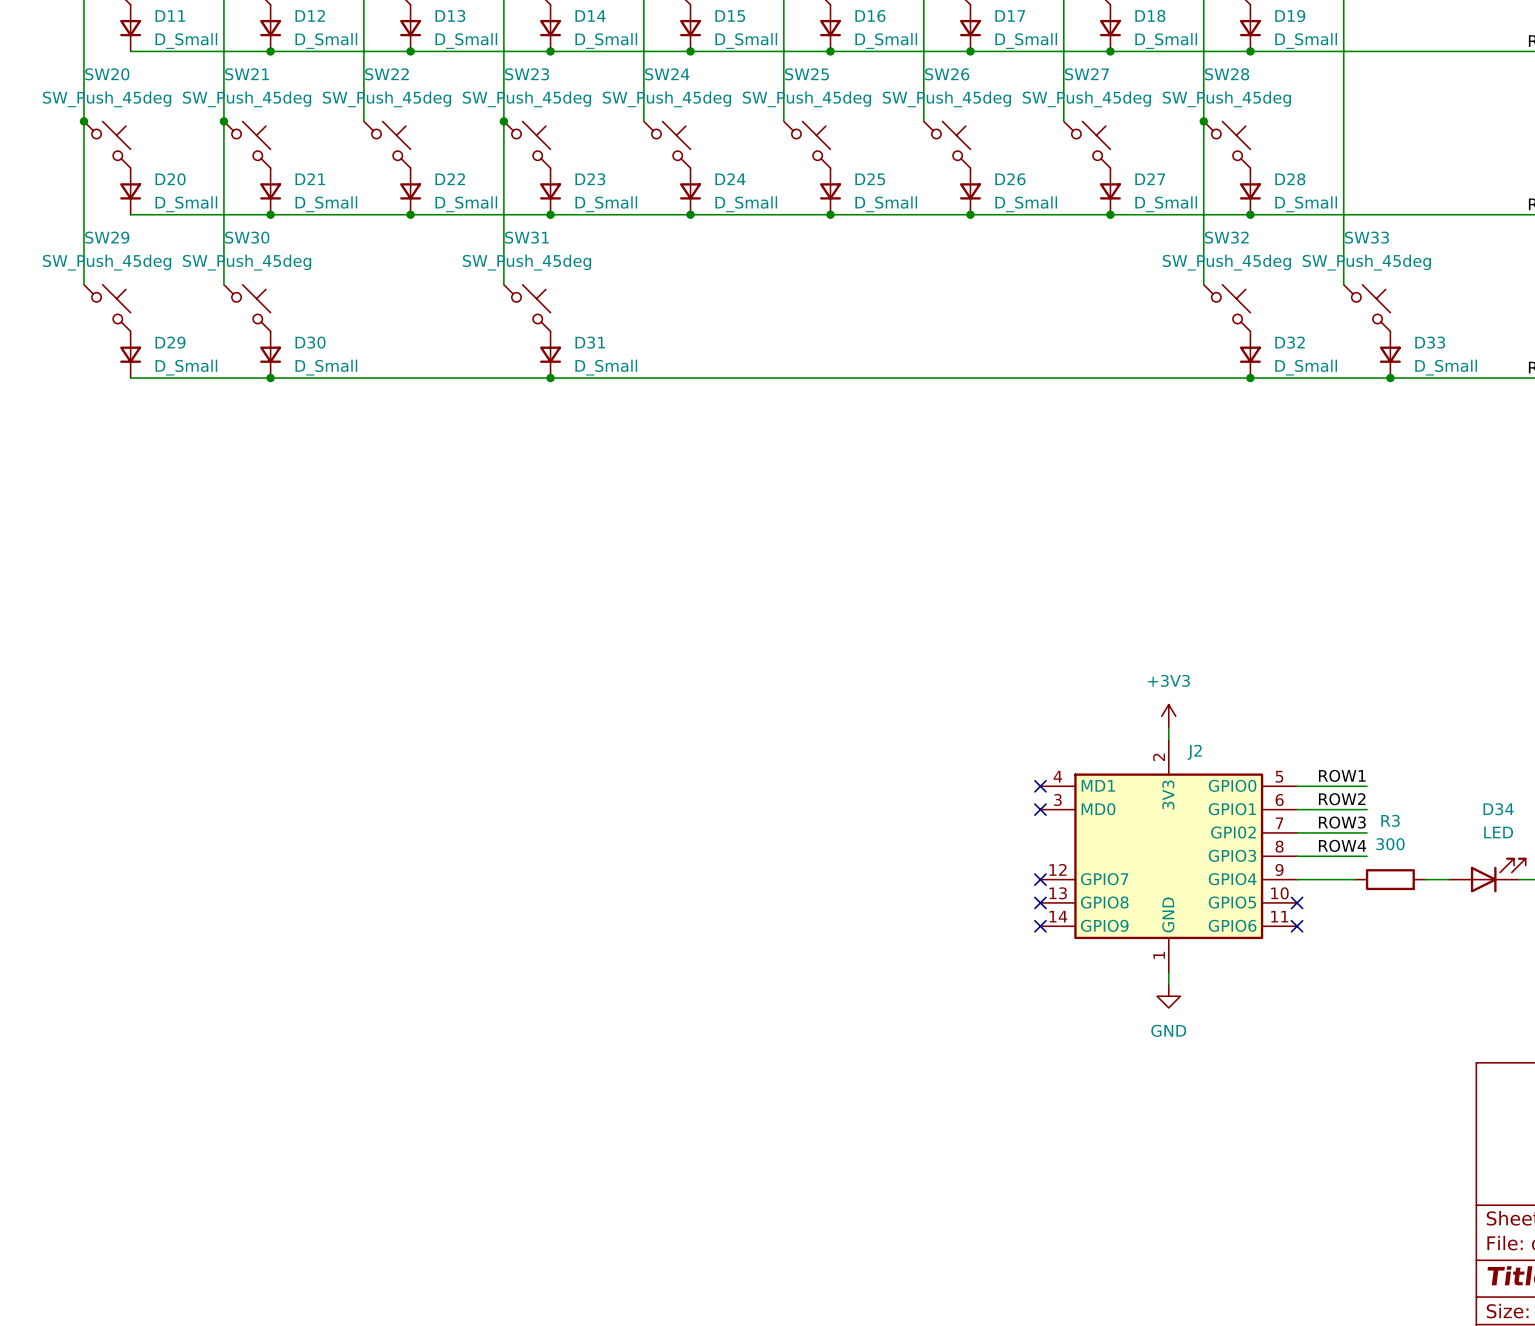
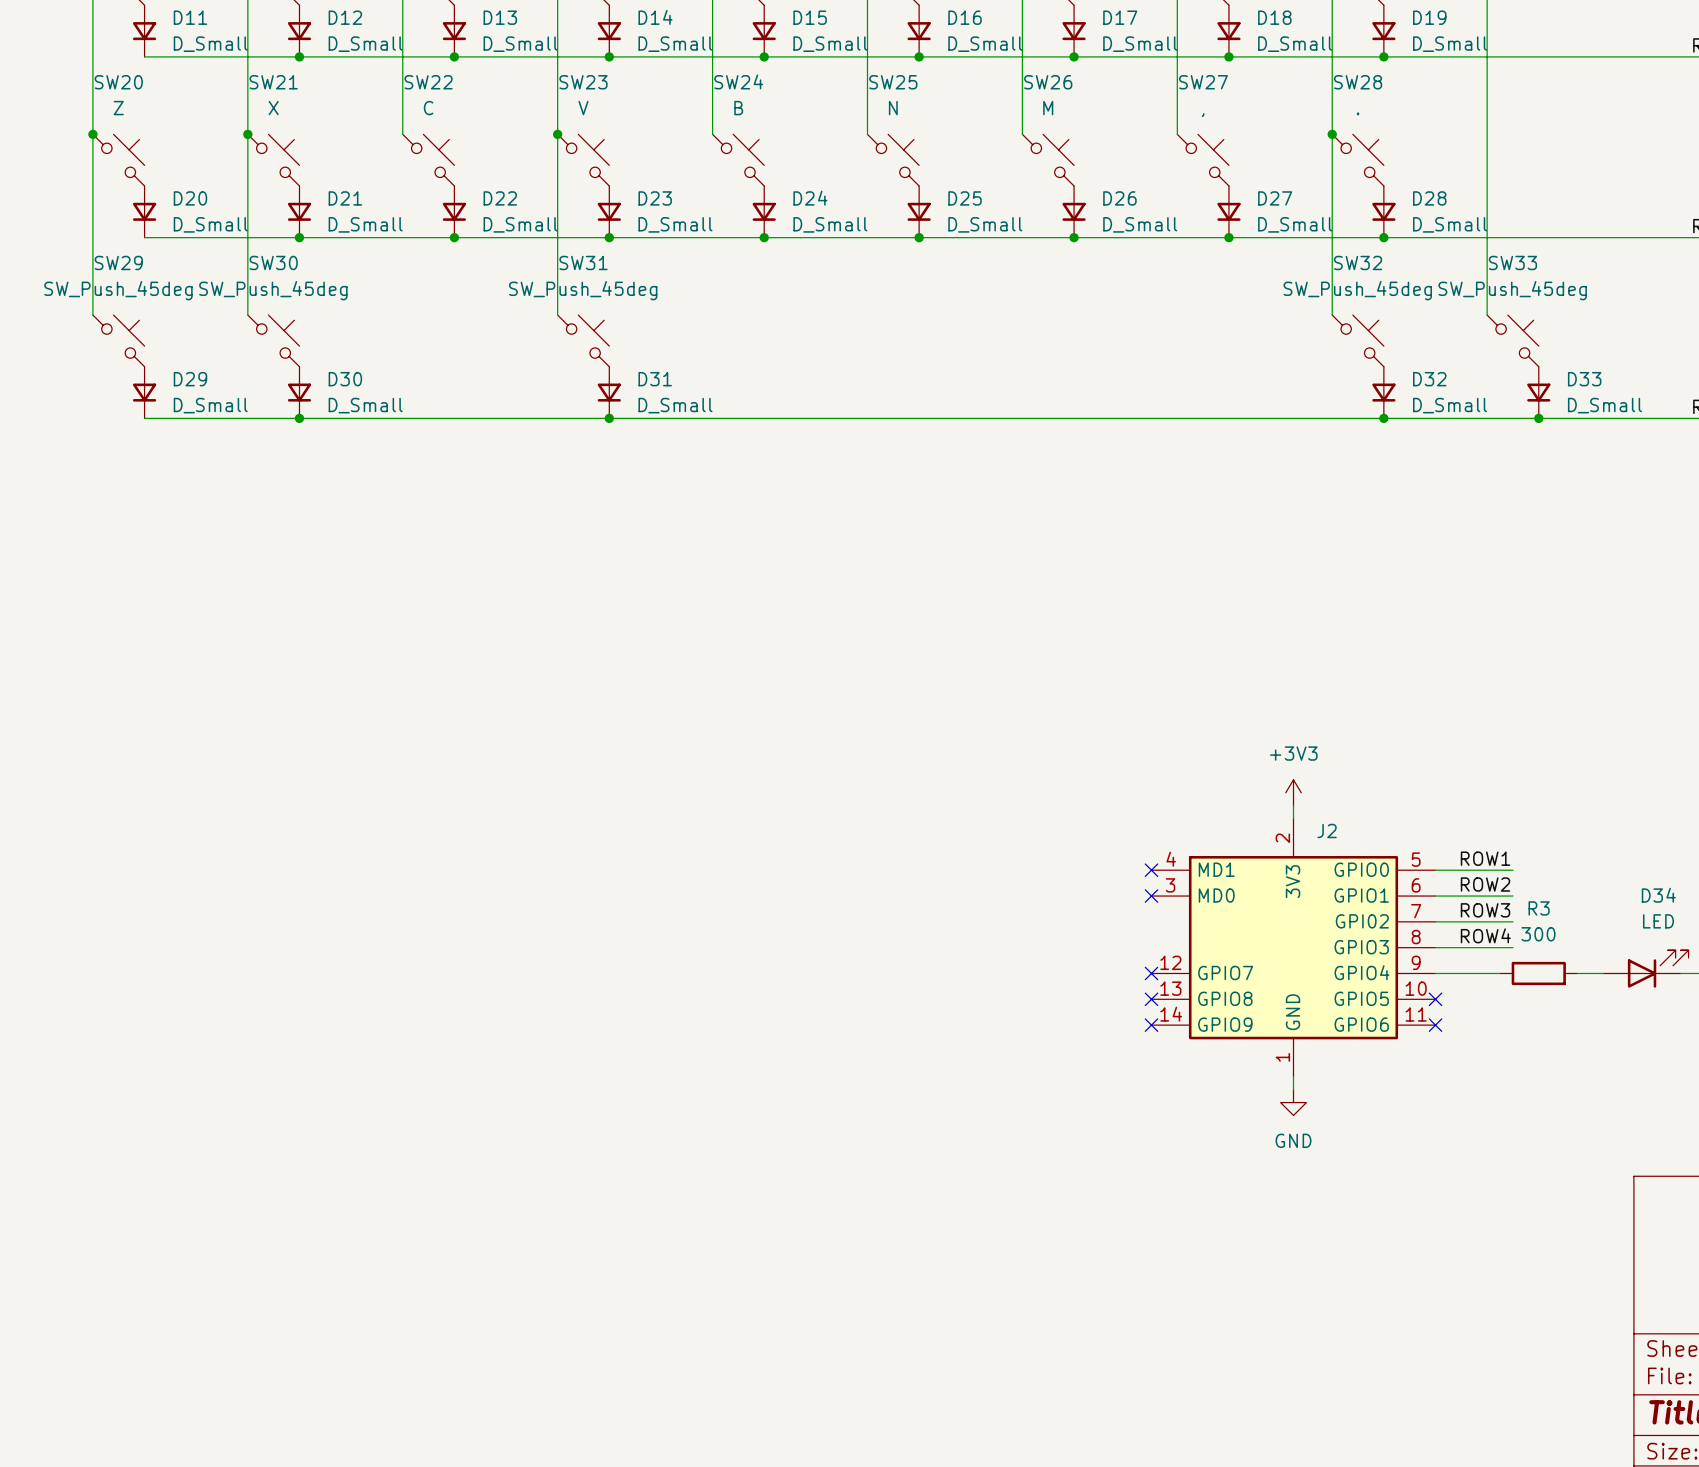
SW20 value: SW_Push_45deg (107, 99) -> Z (118, 108)
SW21 value: SW_Push_45deg (247, 99) -> X (273, 108)
SW22 value: SW_Push_45deg (387, 99) -> C (428, 108)
SW23 value: SW_Push_45deg (527, 99) -> V (583, 108)
SW24 value: SW_Push_45deg (666, 99) -> B (738, 108)
SW25 value: SW_Push_45deg (806, 99) -> N (893, 108)
SW26 value: SW_Push_45deg (946, 99) -> M (1048, 108)
SW27 value: SW_Push_45deg (1086, 99) -> , (1203, 115)
SW28 value: SW_Push_45deg (1226, 99) -> . (1358, 113)

